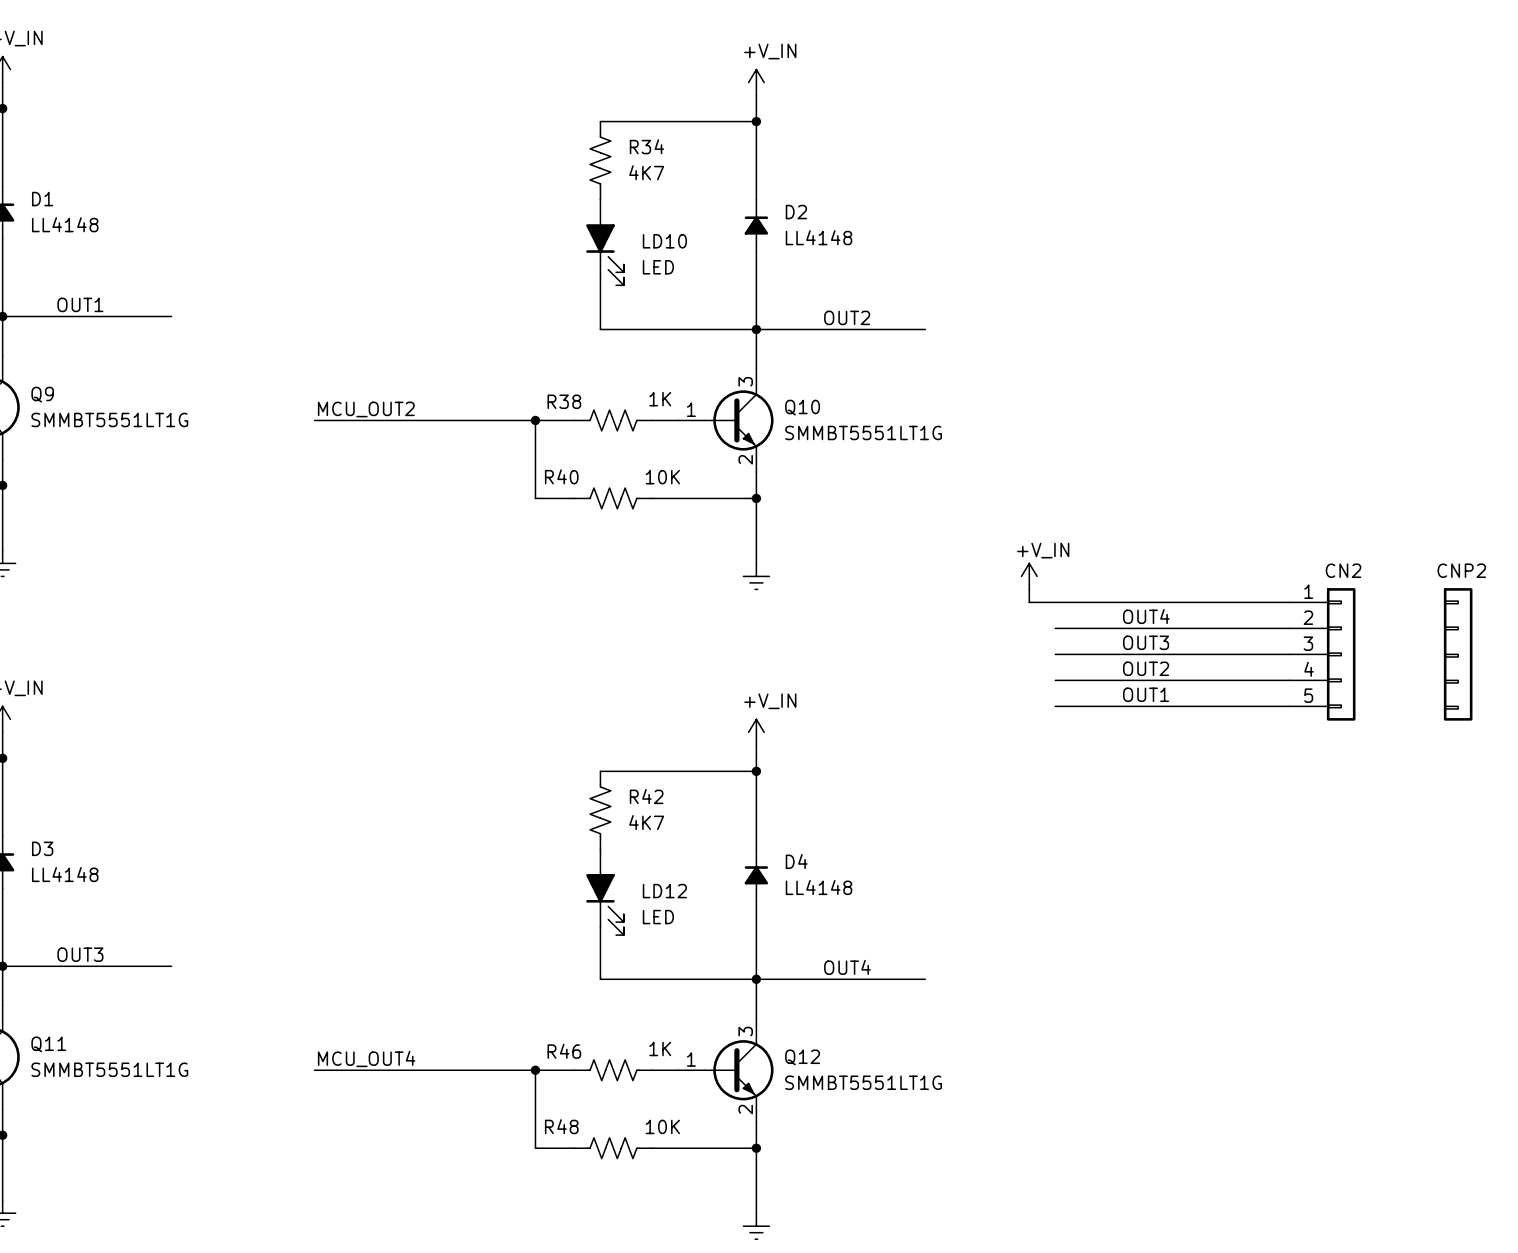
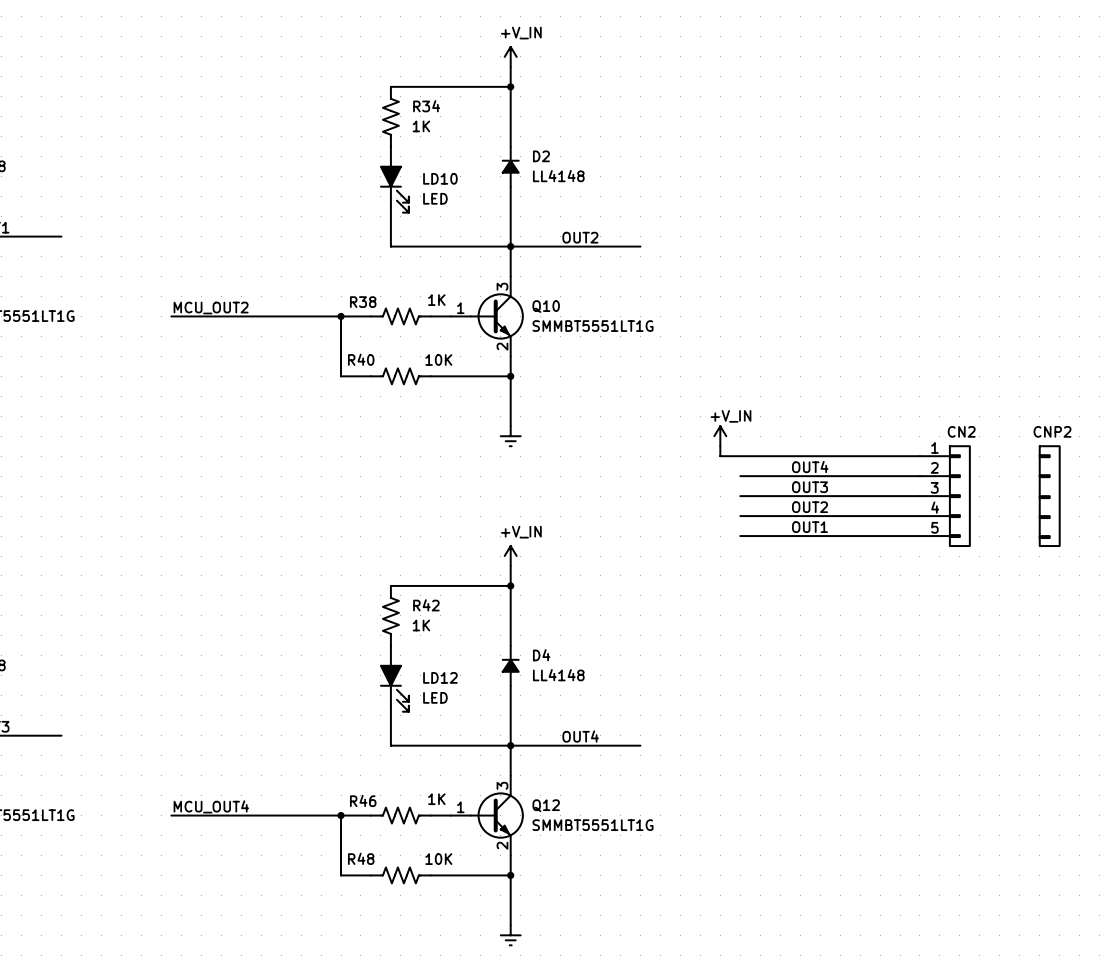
R34 value: 4K7 (646, 172) -> 1K (421, 126)
R42 value: 4K7 (646, 822) -> 1K (421, 625)

